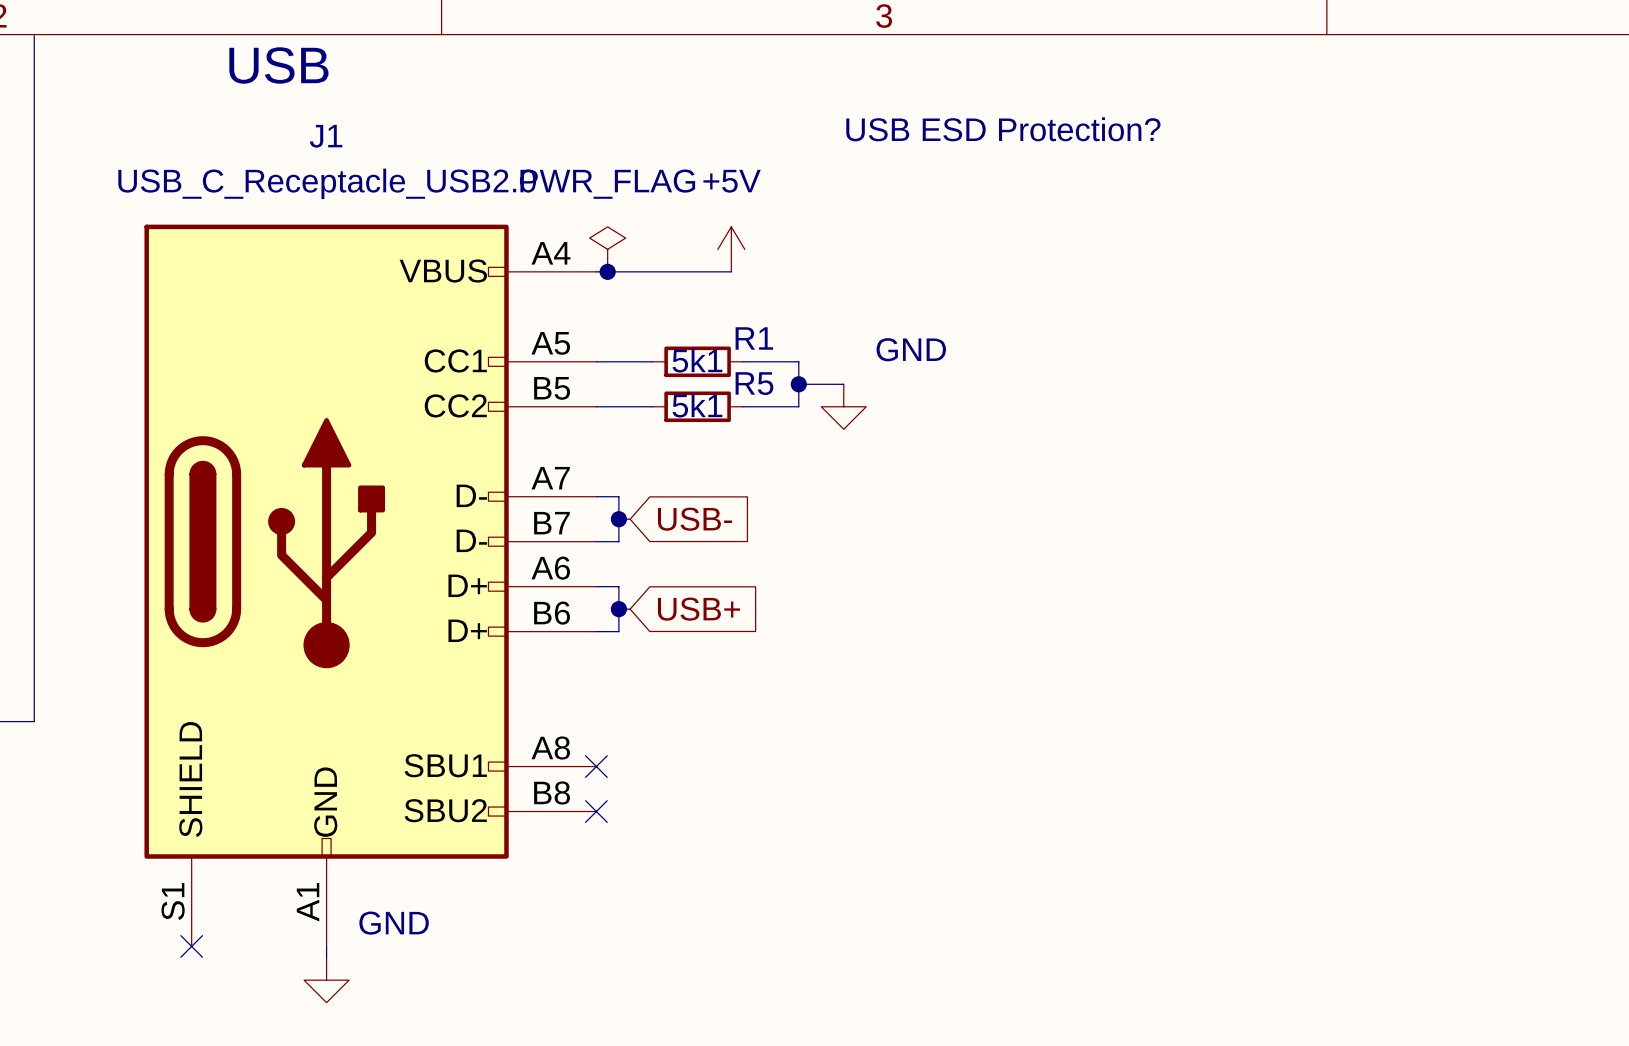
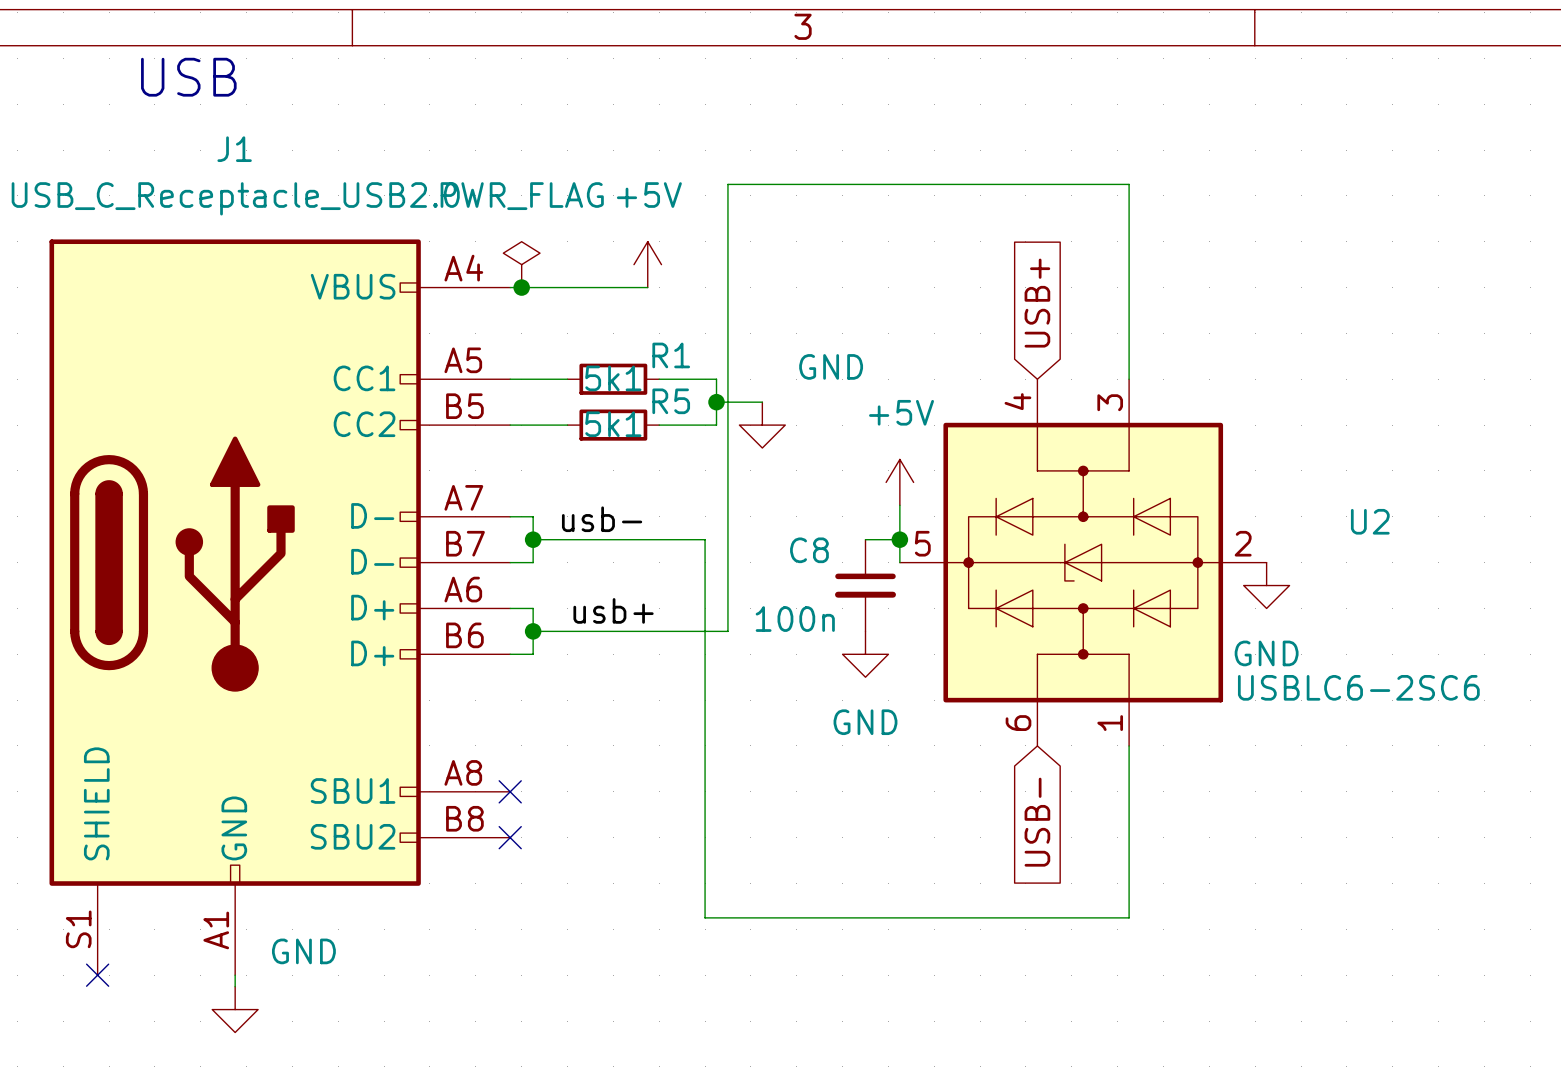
text: USB ESD Protection? (1003, 129) -> none
global label: none -> USB+ (1037, 303)
wire: none -> (1129, 379) (1129, 184) (727, 184) (727, 631) (544, 631)
power symbol: none -> +5V (899, 482)
wire: none -> (899, 505) (899, 562)
label: none -> usb- (602, 519)
wire: none -> (544, 539) (705, 539) (705, 917) (1129, 917) (1129, 745)
global label: USB- (695, 519) -> none
wire: none -> (865, 539) (899, 539)
junction: none -> (899, 539)
U2: none -> USBLC6-2SC6 (1083, 562)
C8: none -> 100n (865, 585)
power symbol: none -> GND (1266, 585)
label: none -> usb+ (613, 610)
global label: USB+ (699, 609) -> none
power symbol: none -> GND (865, 654)
global label: none -> USB- (1037, 822)

